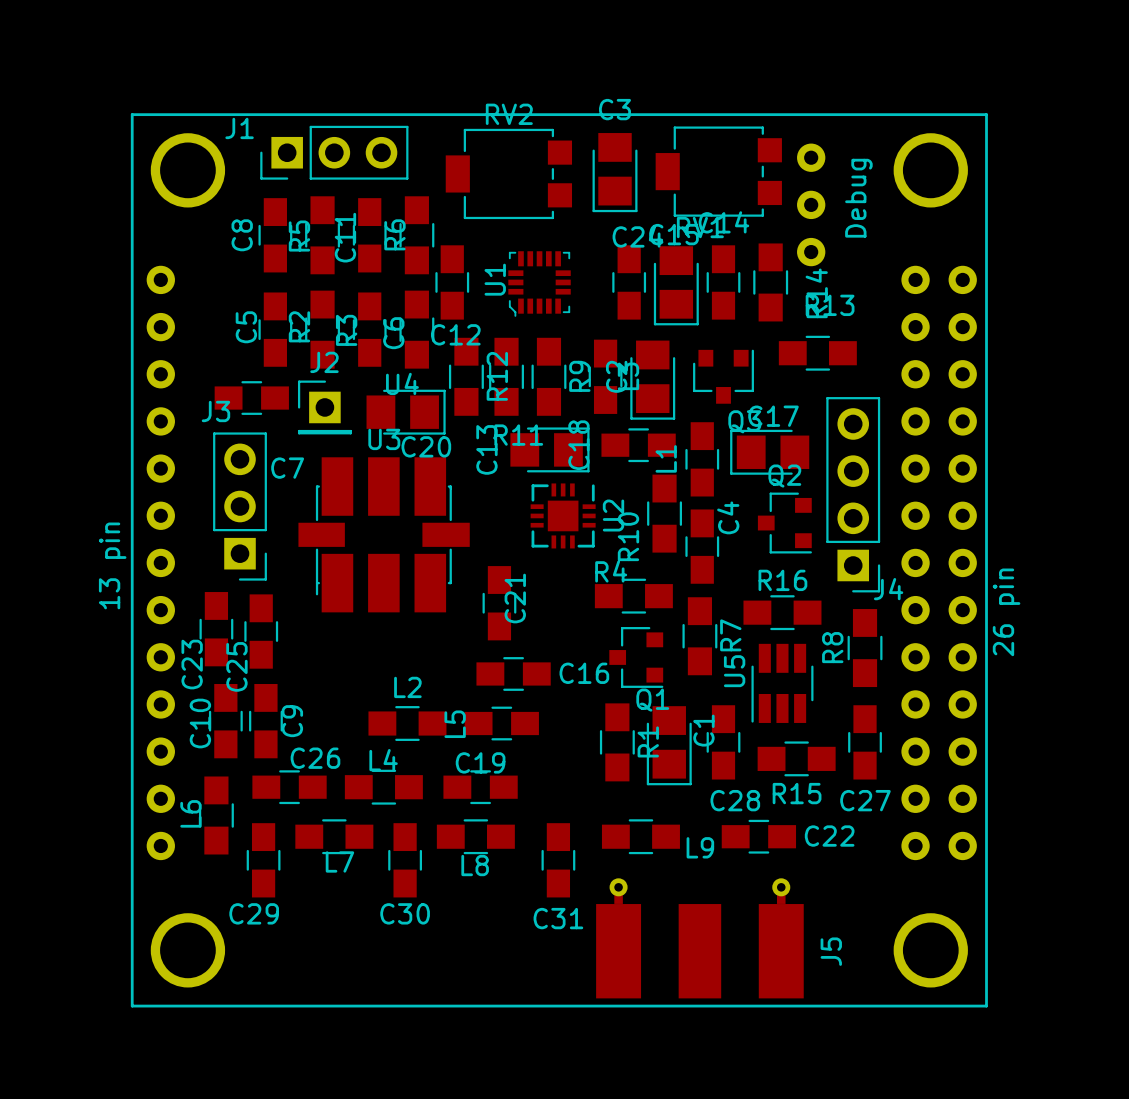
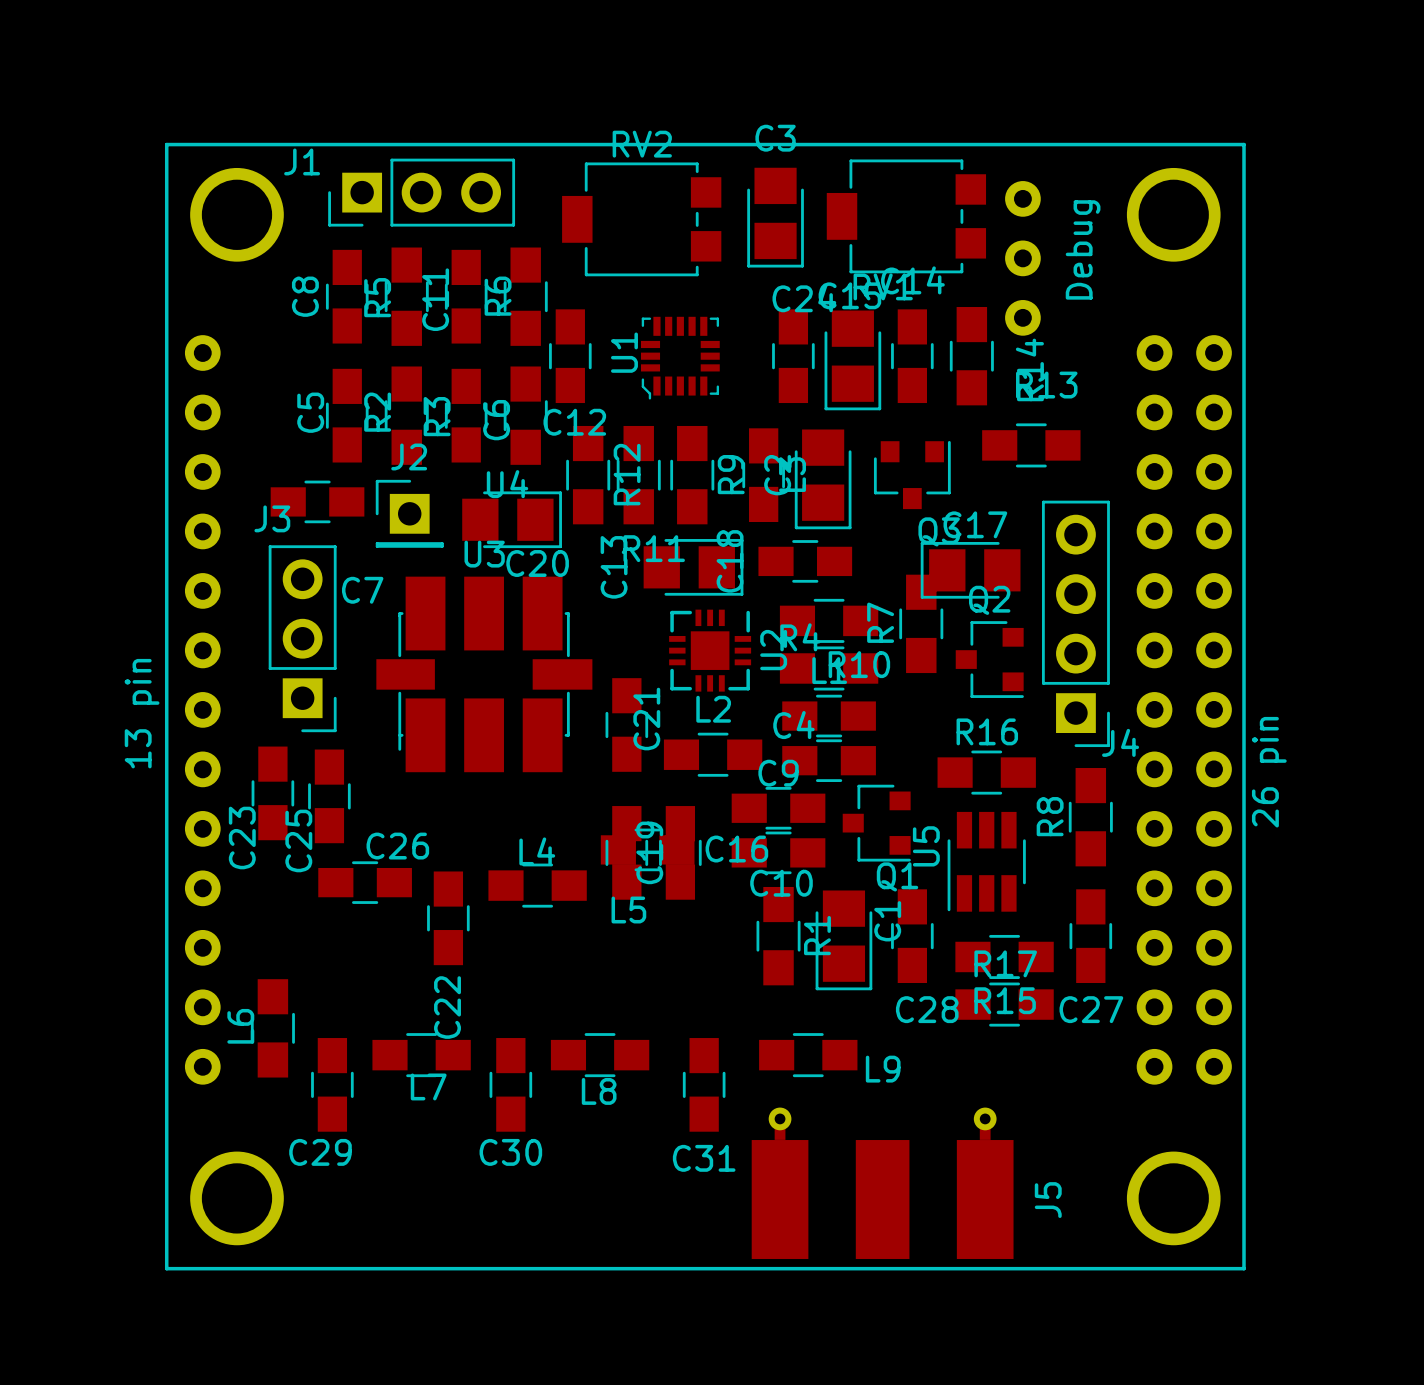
L1 rotation: 0° (702, 459) -> 90° clockwise (829, 716)
L1 position: (702, 459) -> (829, 716)
R10 rotation: 0° (664, 513) -> 90° clockwise (829, 620)
C4 name position: C4 (728, 517) -> C4 (793, 725)
R10 name position: R10 (628, 536) -> R10 (859, 664)
C4 rotation: 0° (702, 546) -> 90° clockwise (829, 760)
C4 position: (702, 546) -> (829, 760)
R4 position: (633, 596) -> (829, 668)
C21 position: (499, 603) -> (626, 724)
R7 name position: R7 (730, 635) -> R7 (880, 622)
R7 position: (699, 636) -> (921, 623)
Q1 position: (636, 657) -> (876, 823)
C10 rotation: 0° (225, 721) -> 90° clockwise (778, 852)
C10 position: (225, 721) -> (778, 852)
C9 rotation: 0° (265, 721) -> 90° clockwise (778, 808)
C9 position: (265, 721) -> (778, 808)
C9 name position: C9 (292, 721) -> C9 (778, 773)
L2 position: (407, 723) -> (713, 754)
L5 rotation: 0° (501, 723) -> 90° clockwise (626, 852)
L5 position: (501, 723) -> (626, 852)
L5 name position: L5 (455, 724) -> L5 (628, 910)
C26 position: (289, 787) -> (365, 882)
L4 position: (383, 787) -> (537, 885)
C19 rotation: 0° (480, 787) -> 90° clockwise (680, 852)
C19 position: (480, 787) -> (680, 852)
R17: none -> (1004, 1004)
C22 rotation: 0° (758, 836) -> 90° clockwise (448, 918)
C22 position: (758, 836) -> (448, 918)

